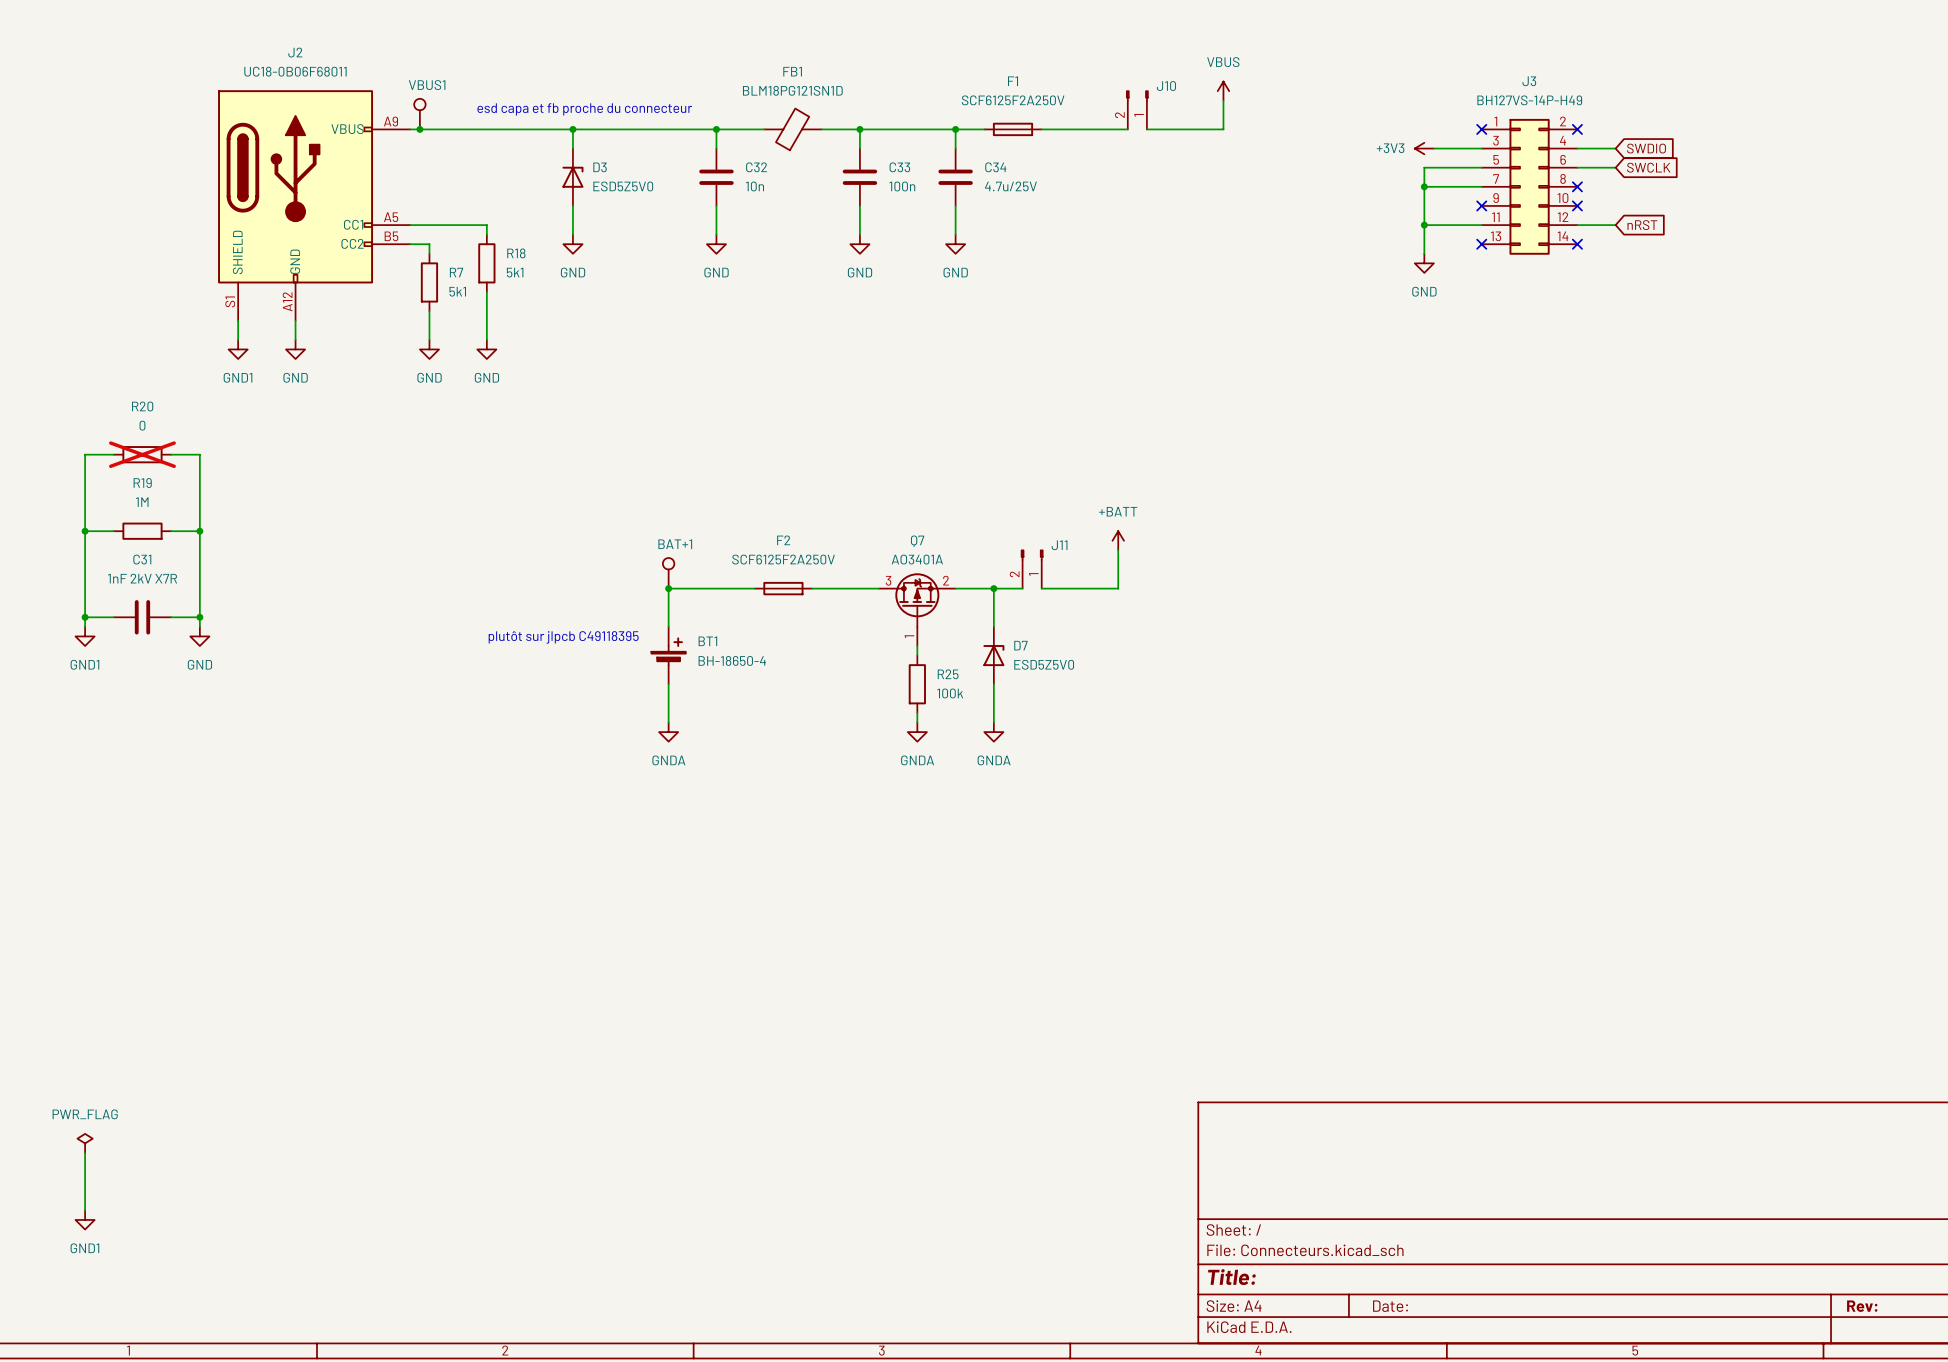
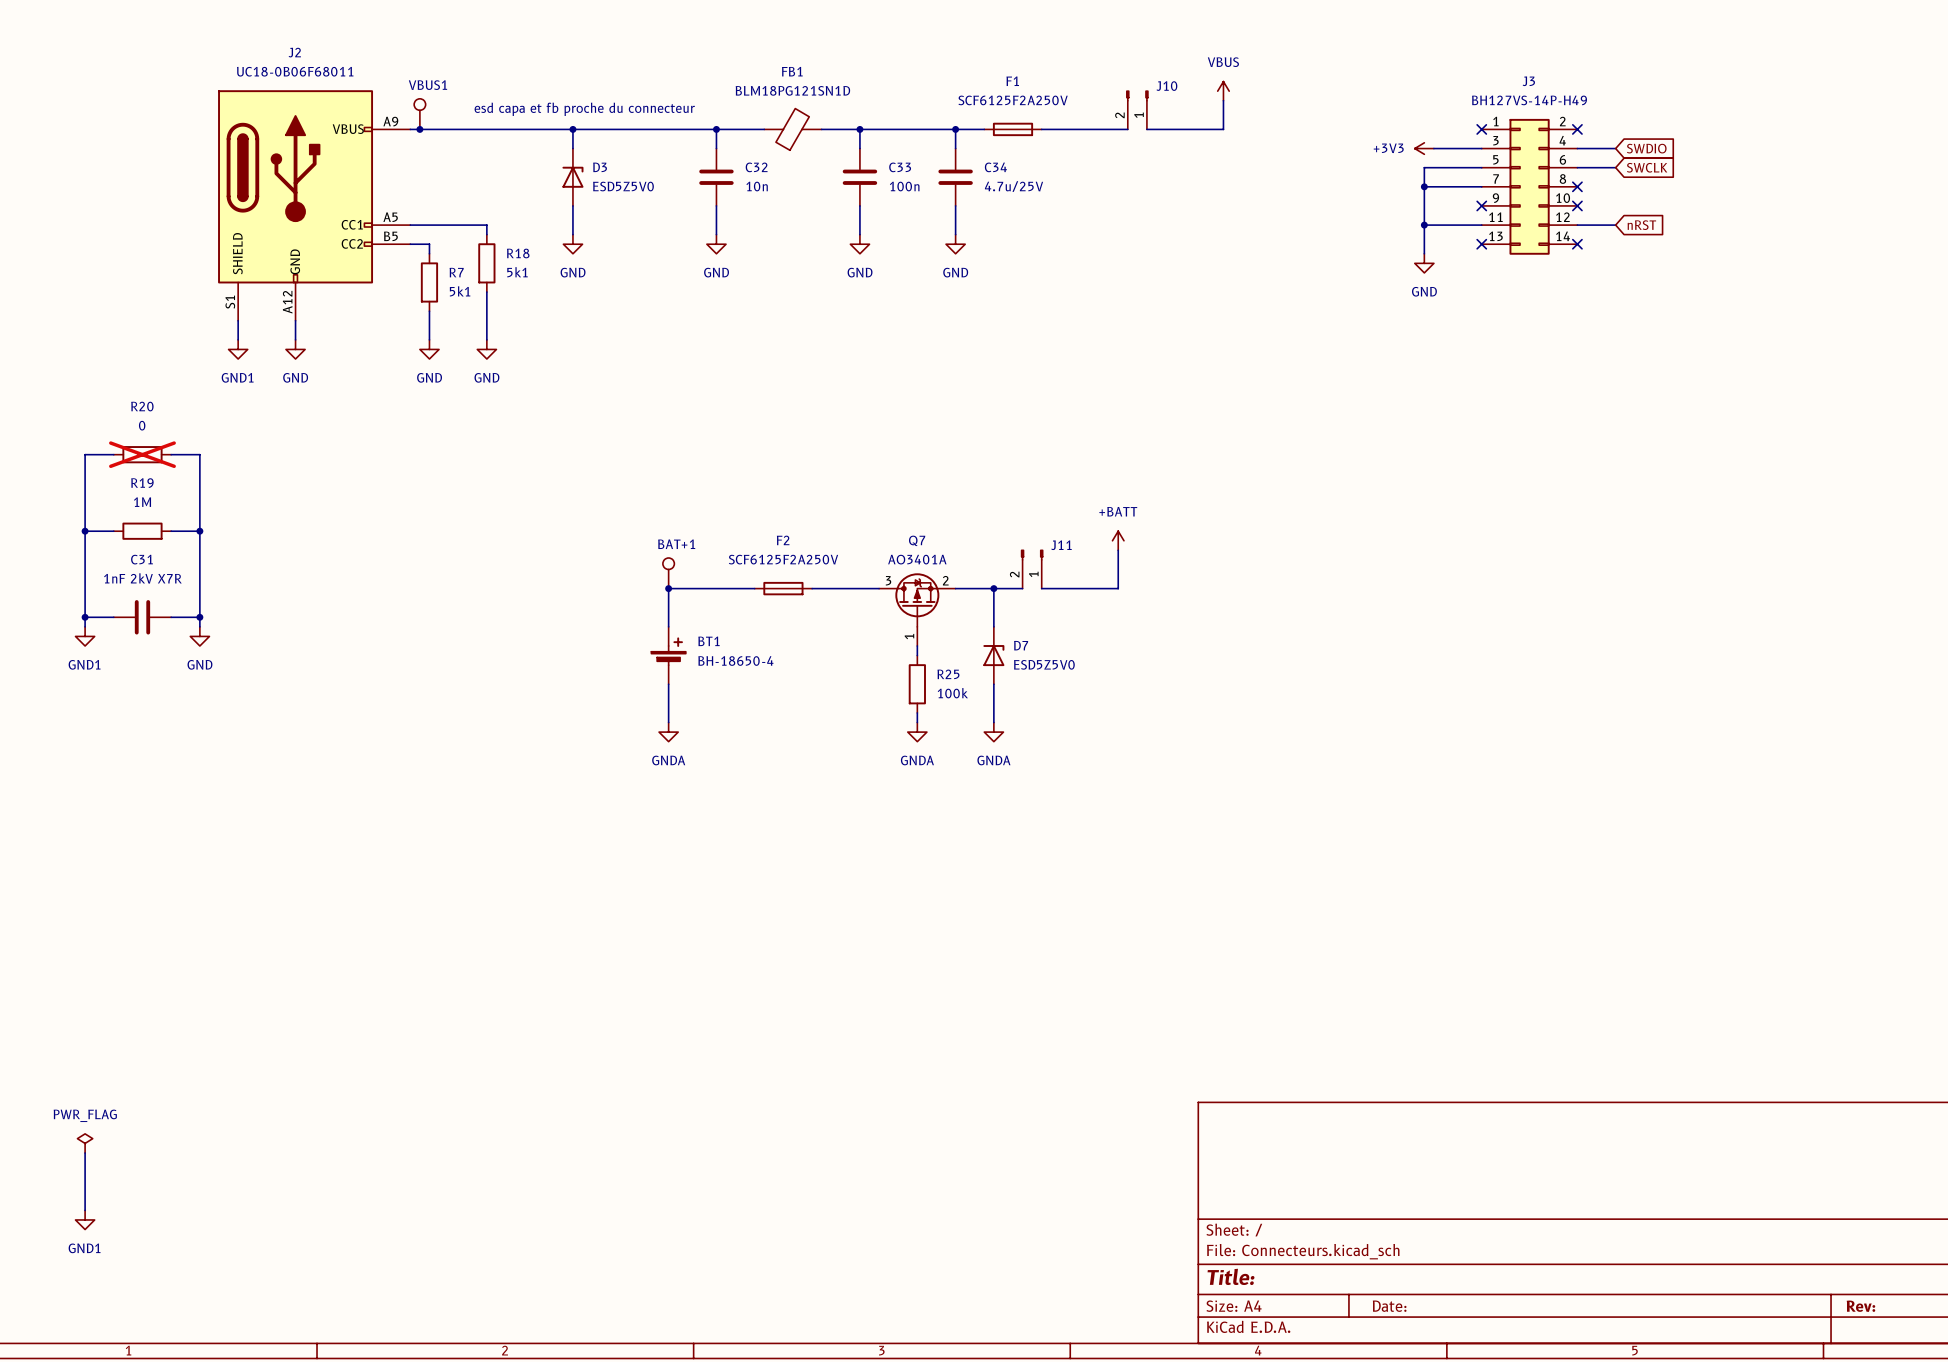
text: plutôt sur jlpcb C49118395 (563, 637) -> none

